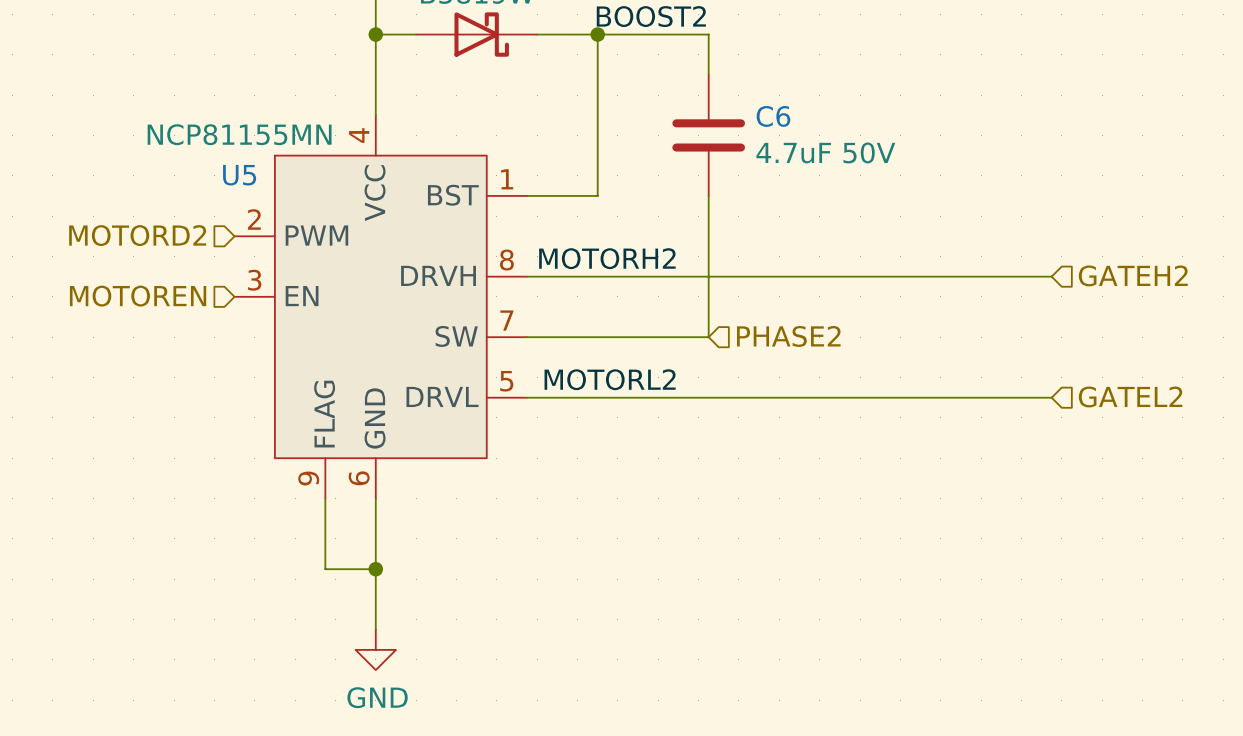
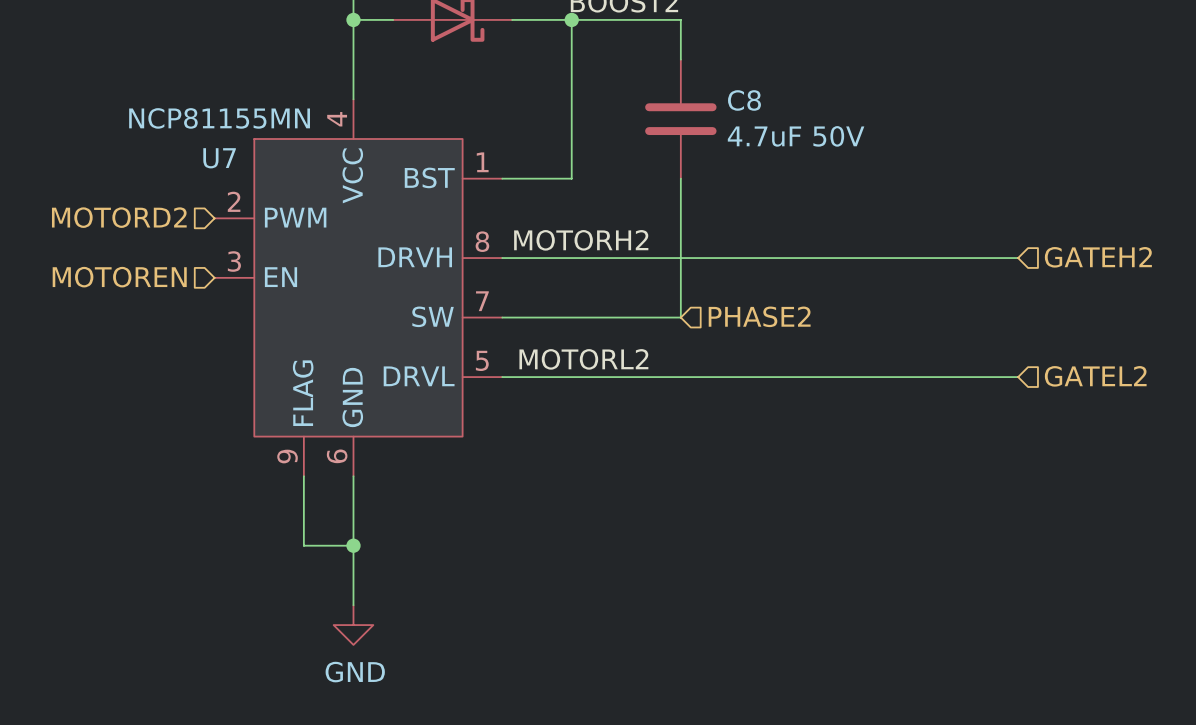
C6 name: C6 (773, 116) -> C8 (744, 100)
U5 name: U5 (239, 175) -> U7 (219, 158)

